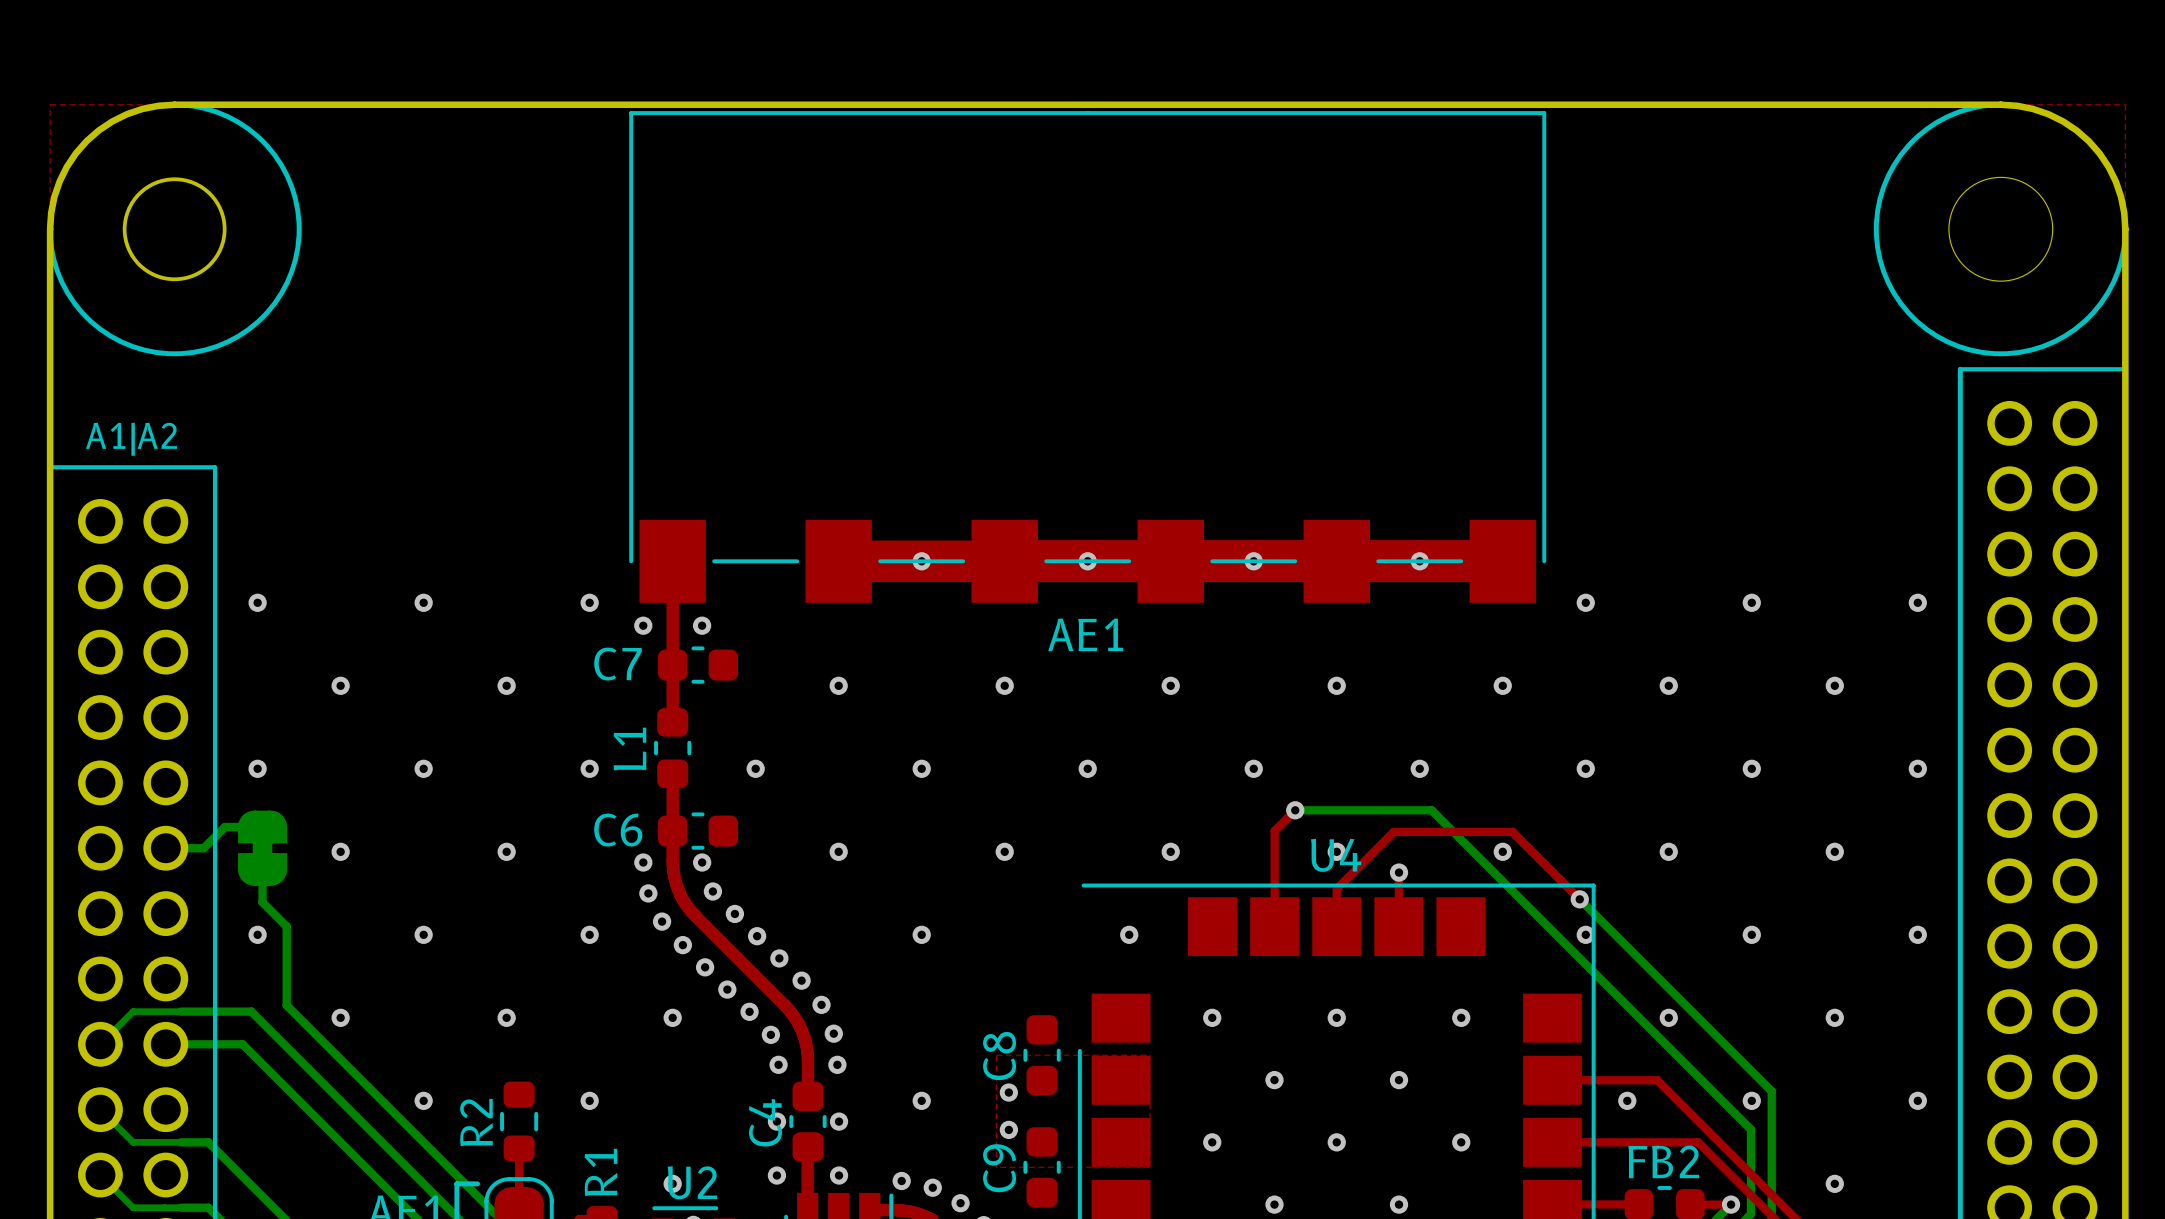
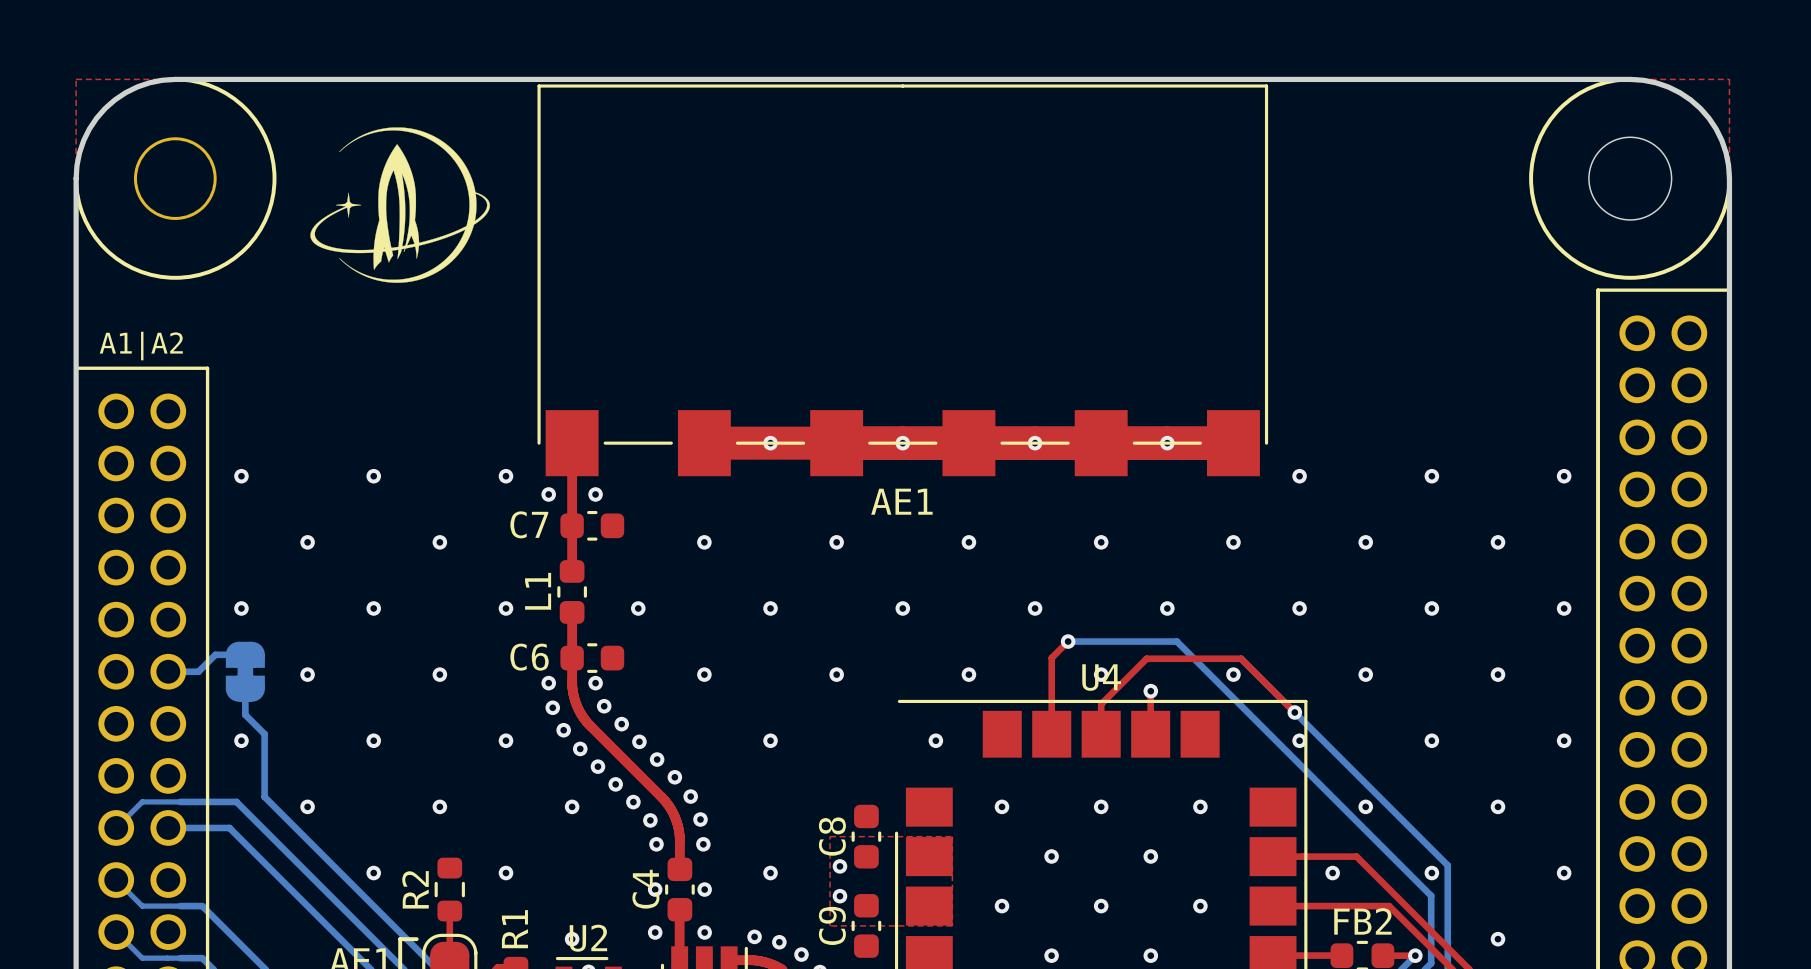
drawing: none -> [310, 127, 490, 283]

